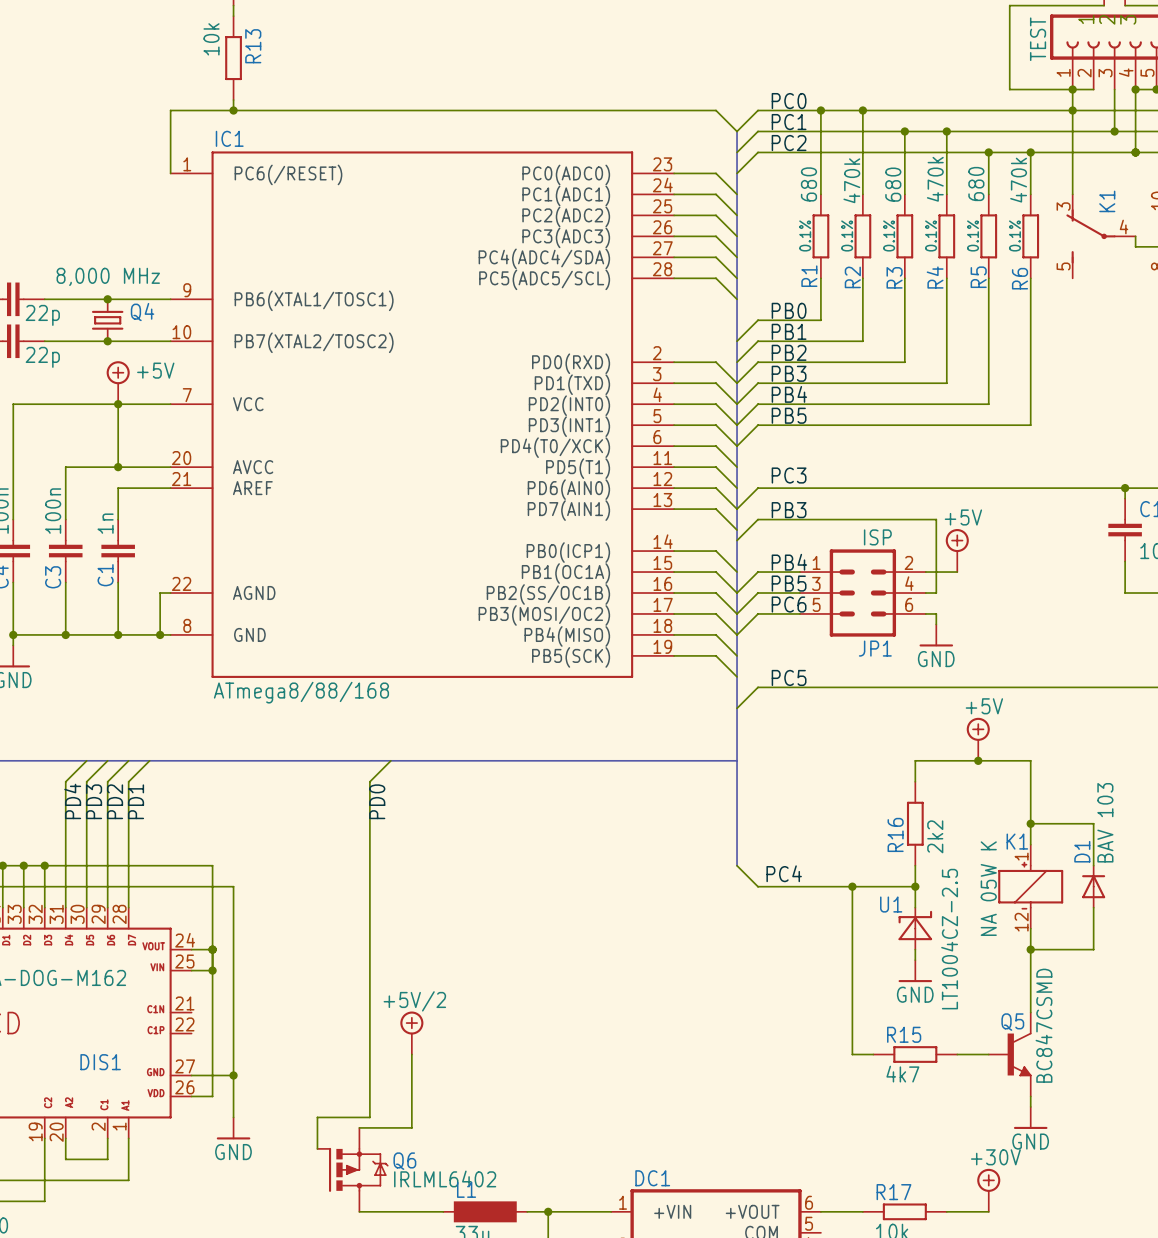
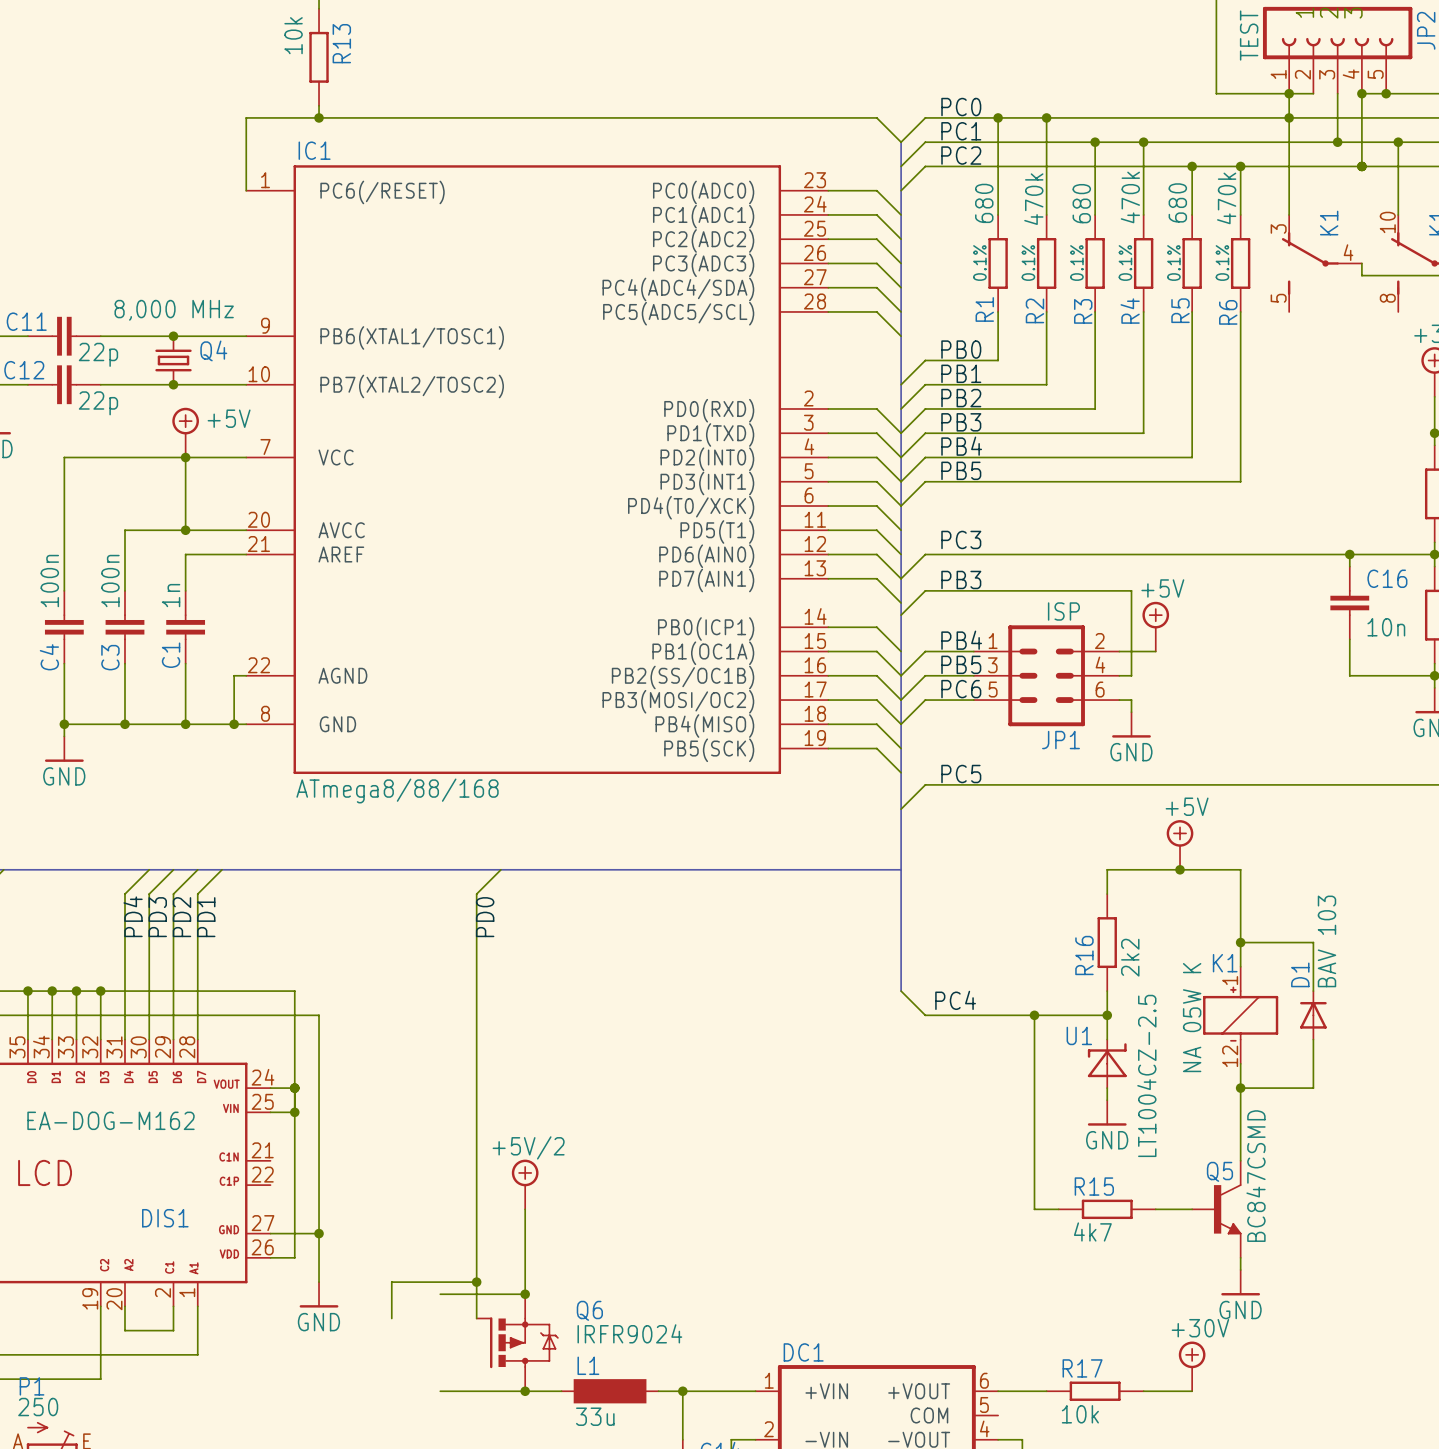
wire: (317, 1117) (317, 1148) -> (416, 1282) (391, 1282) (391, 1318)
wire: none -> (476, 1282) (476, 1318)
junction: none -> (476, 1282)
wire: none -> (440, 1294) (464, 1294)
junction: none -> (525, 1294)
Q6 name position: Q6 (404, 1161) -> Q6 (589, 1310)
Q6 position: (352, 1169) -> (517, 1342)
Q6 value: IRLML6402 (445, 1178) -> IRFR9024 (629, 1333)
wire: none -> (440, 1391) (464, 1391)
junction: none -> (525, 1391)

